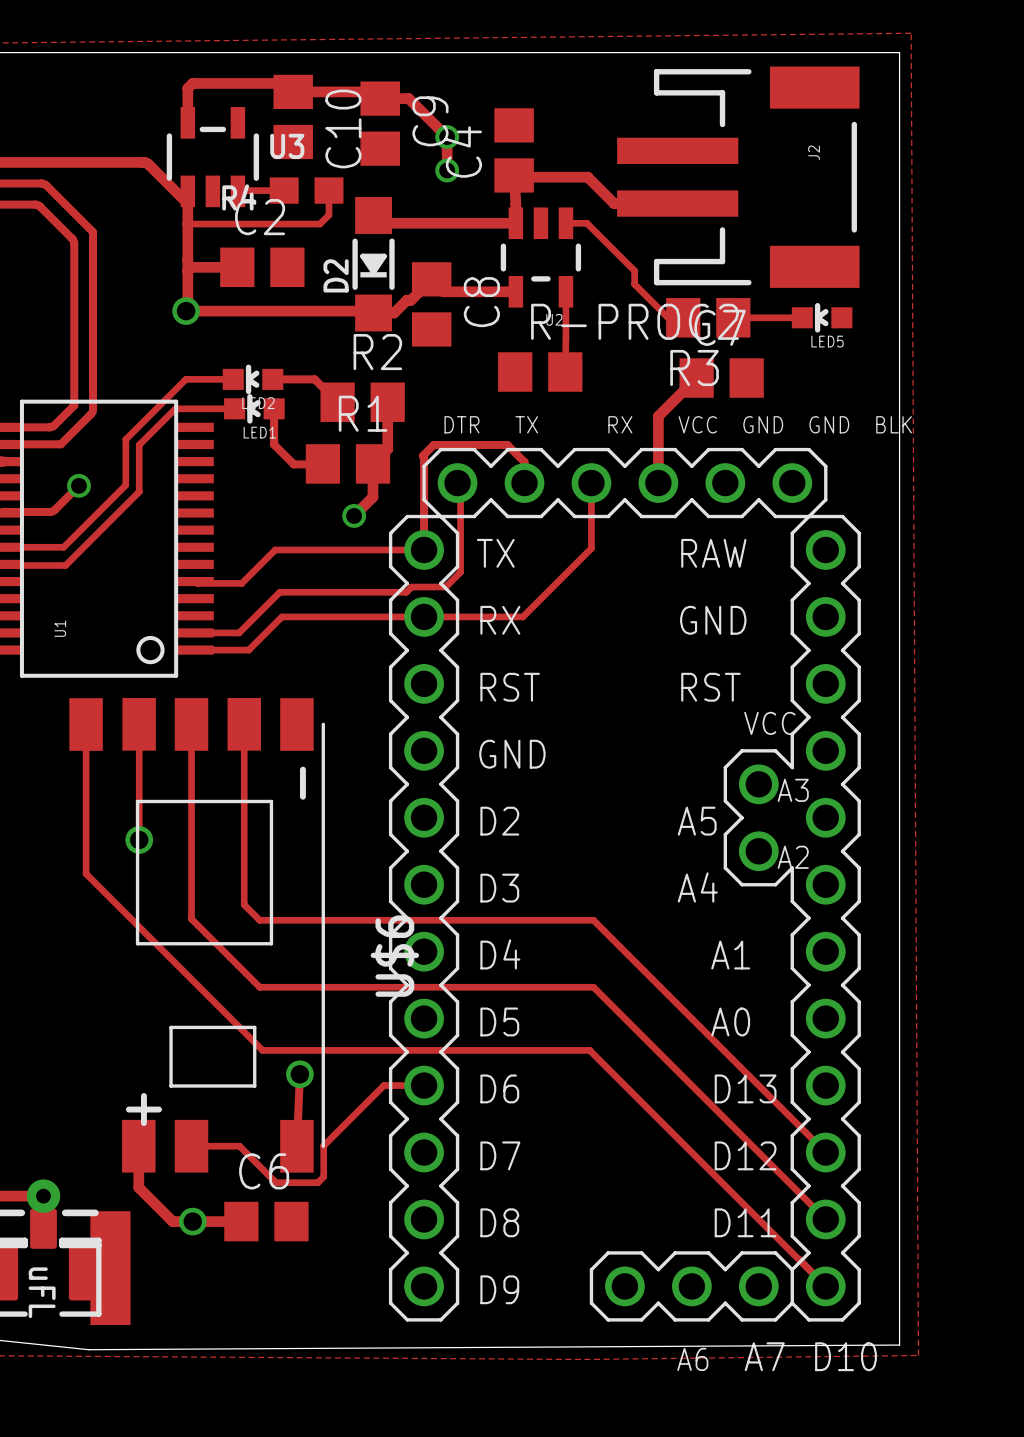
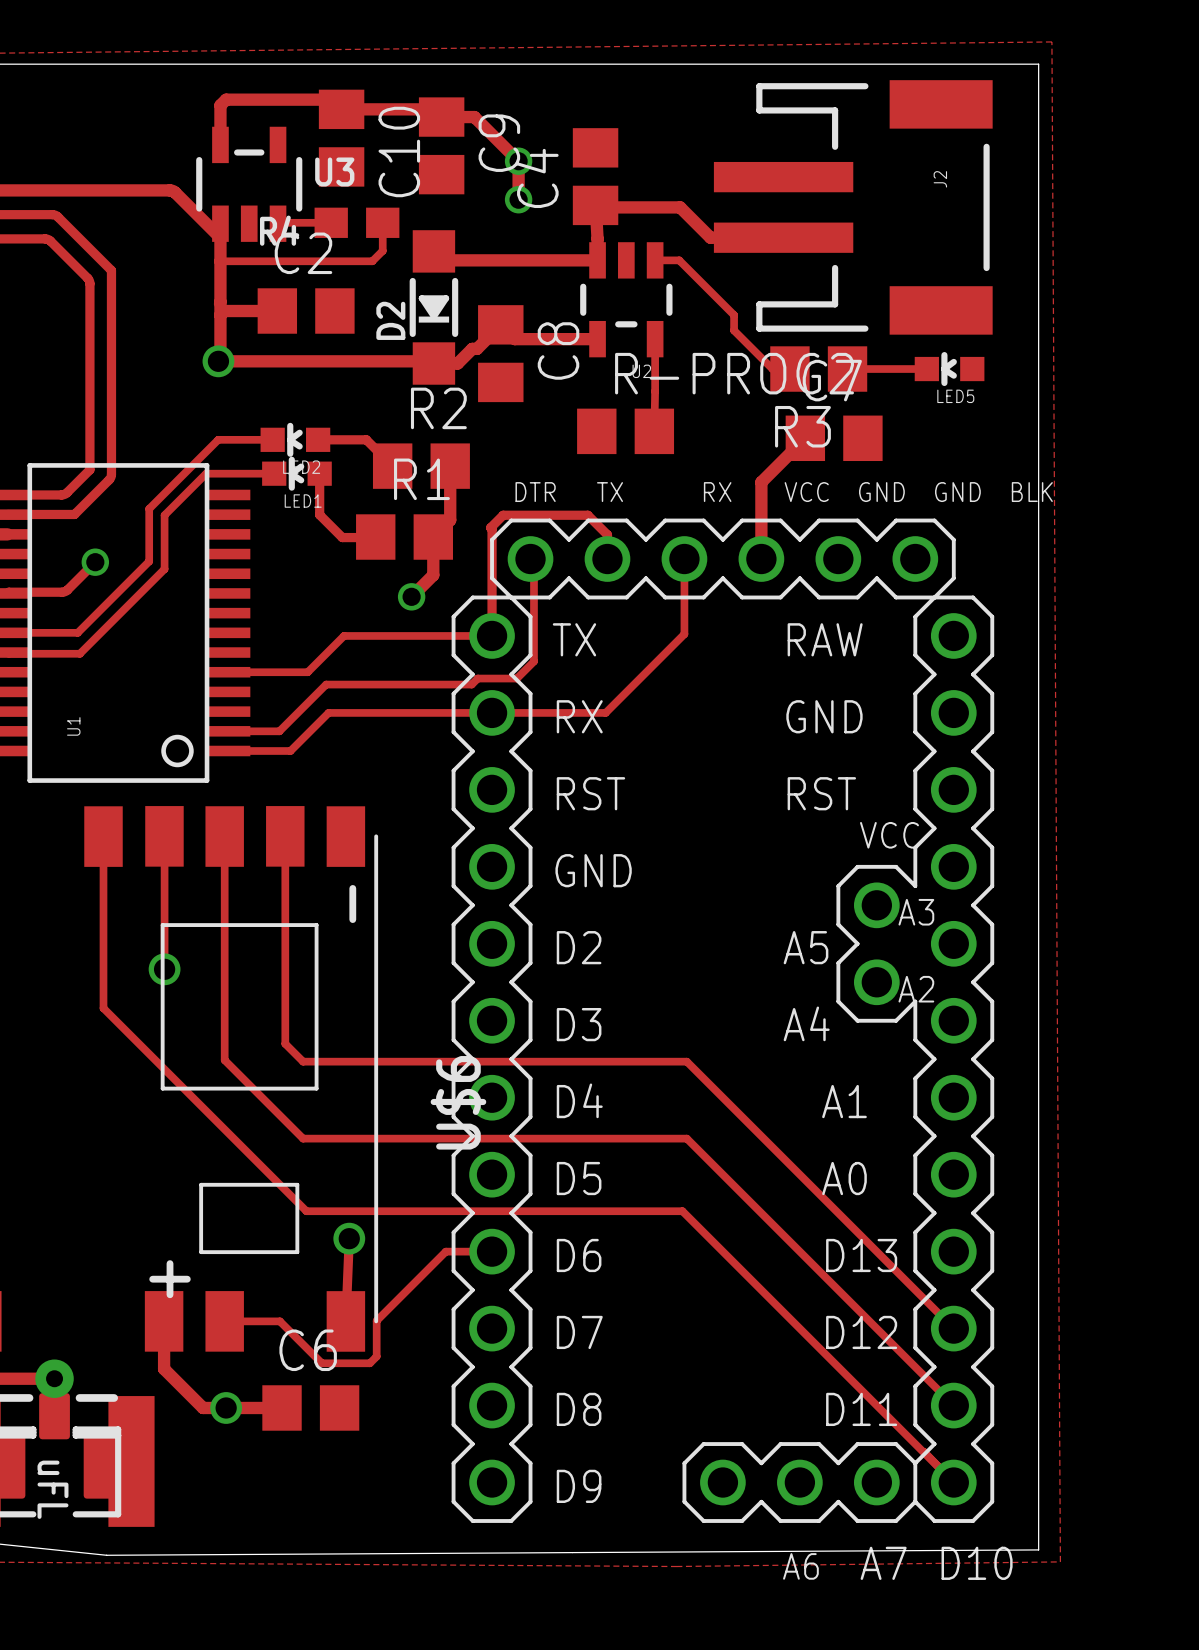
track: (295, 550) (275, 550) (241, 583) (197, 583) (195, 581) -> (344, 635) (307, 672) (229, 672)

